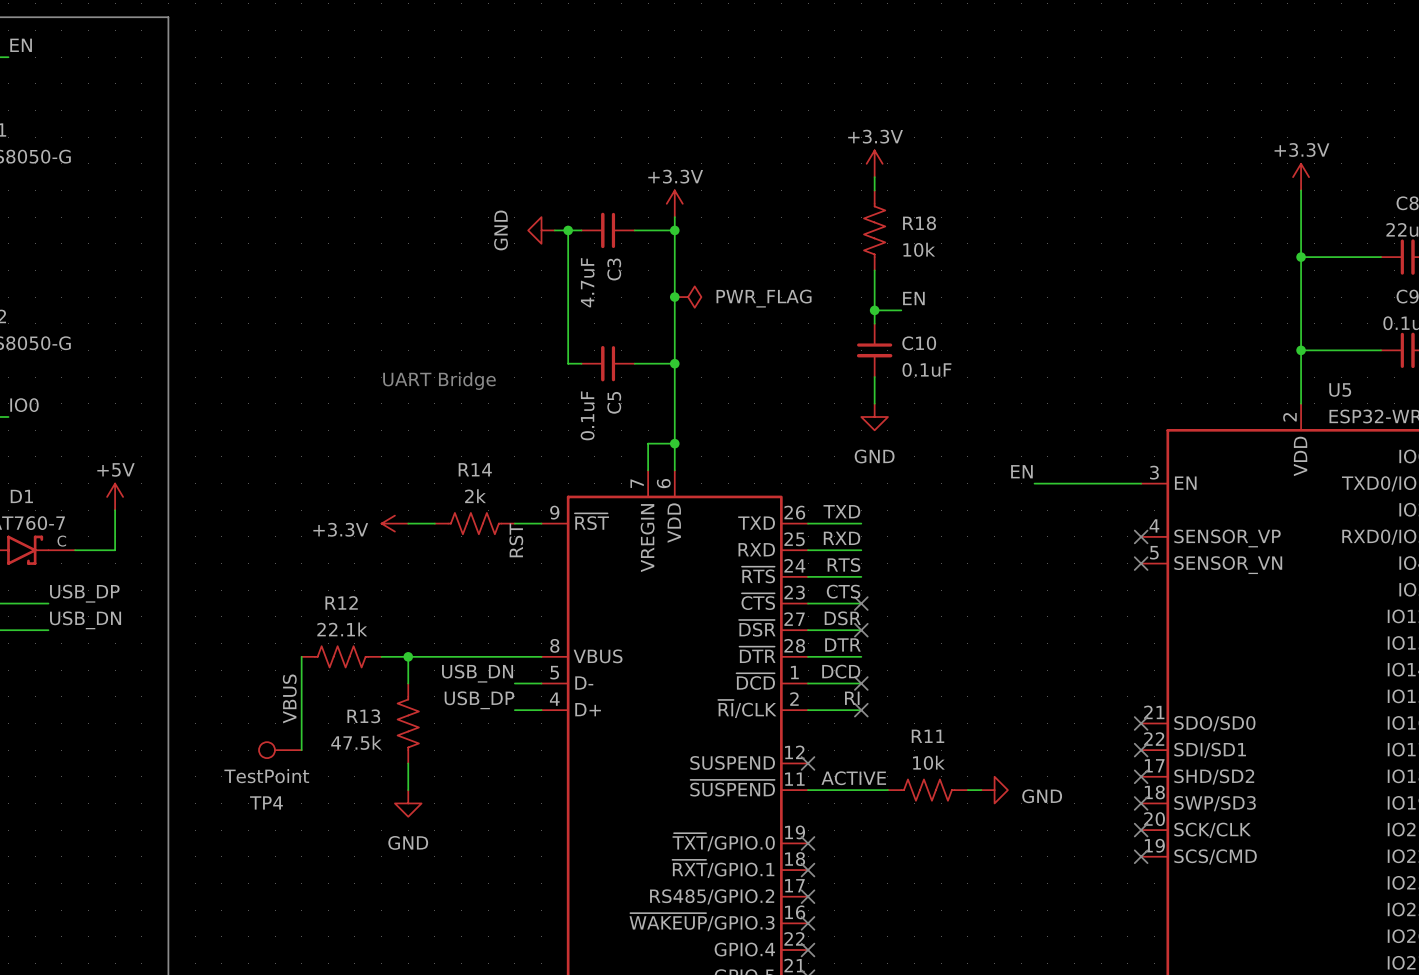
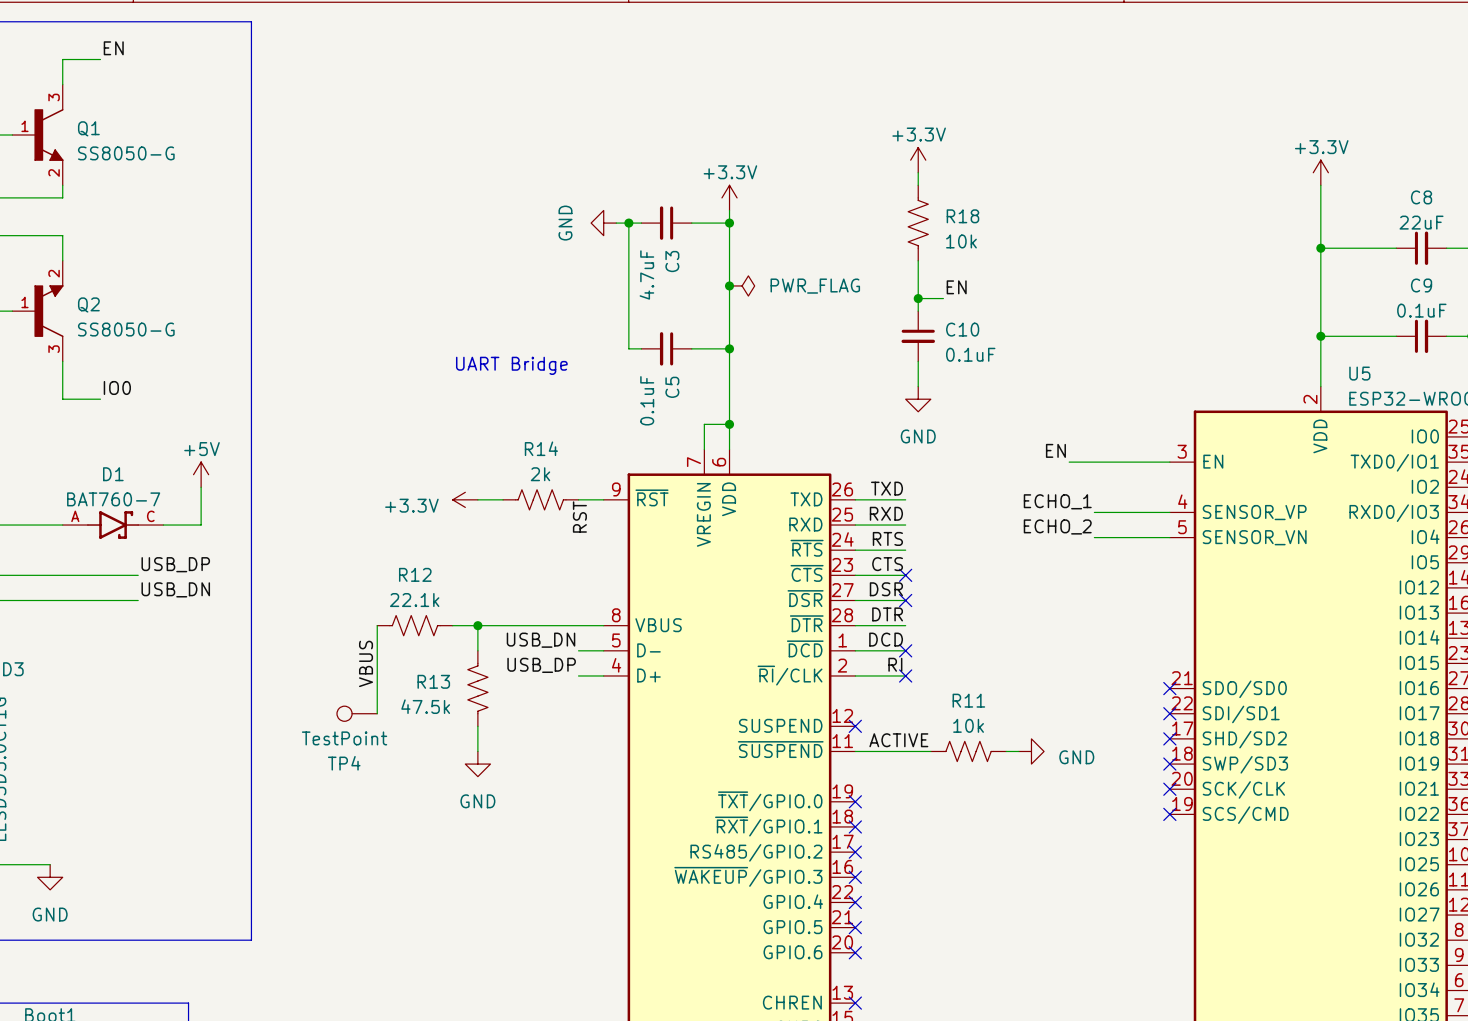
label: none -> ECHO_1 (1057, 501)
wire: none -> (1094, 512) (1169, 512)
no-connect mark: (1141, 536) -> none
label: none -> ECHO_2 (1057, 526)
wire: none -> (1094, 537) (1169, 537)
no-connect mark: (1141, 563) -> none

